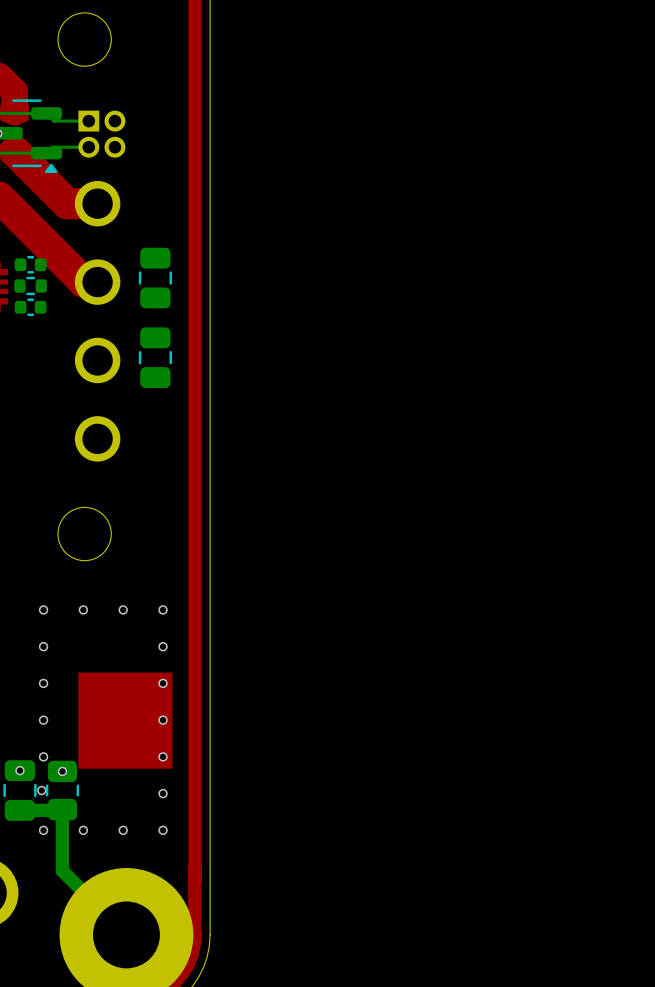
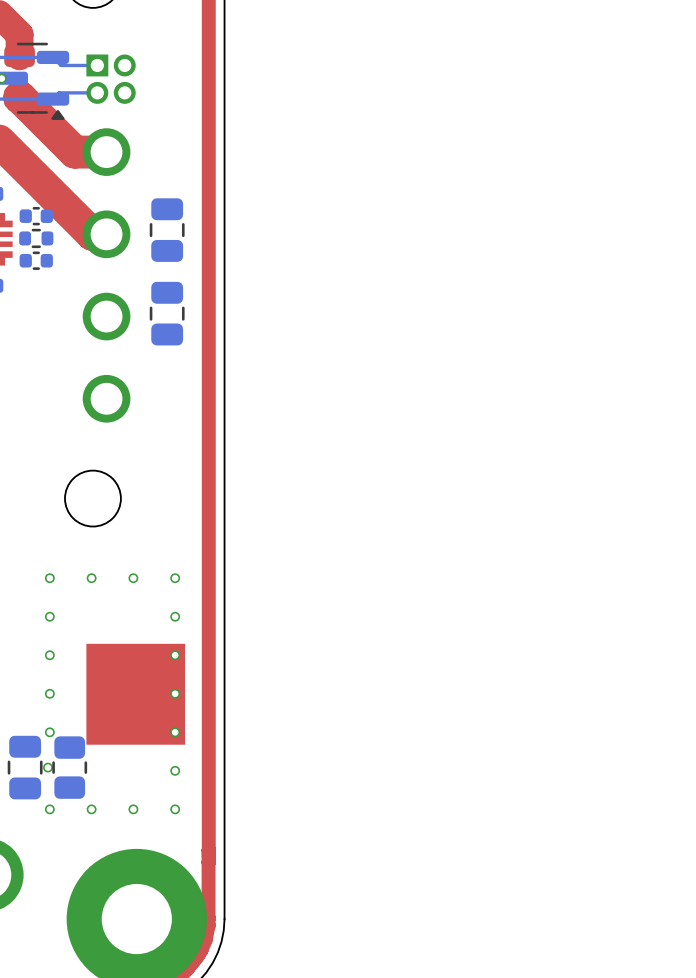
via: (19, 770) -> none
via: (62, 771) -> none
bottom track: (19, 810) (62, 809) (62, 870) (126, 934) -> none

